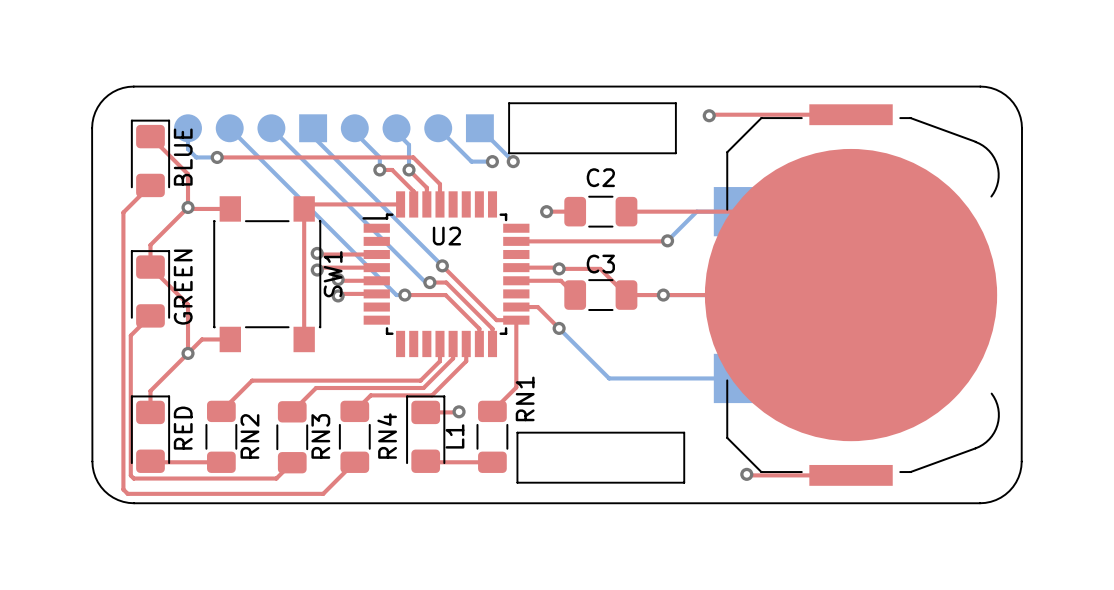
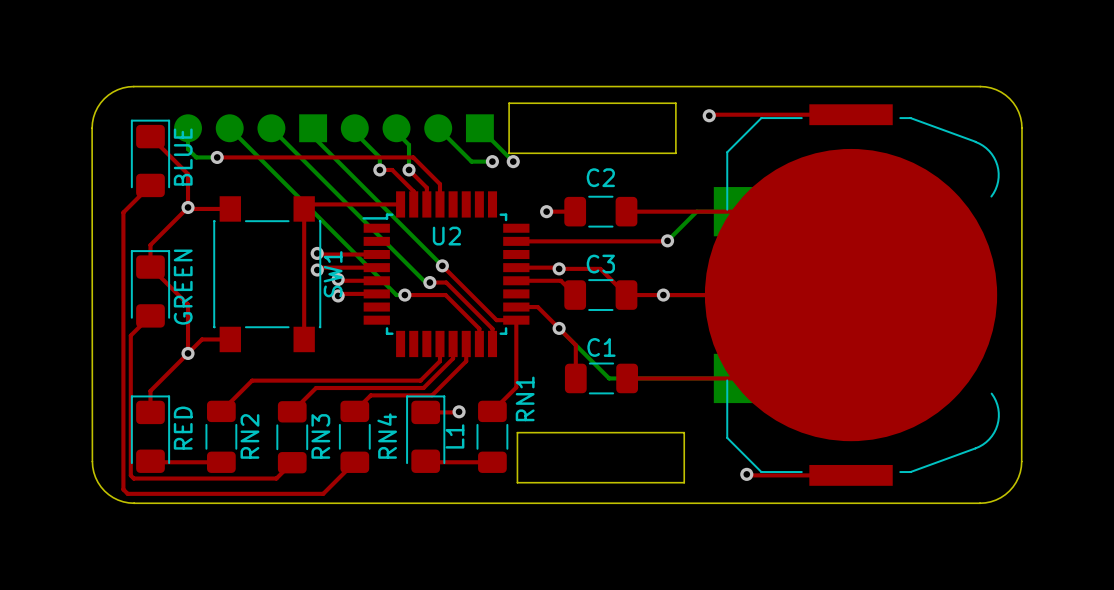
top track: none -> (851, 295) (767, 378) (627, 378)
top track: none -> (559, 328) (575, 345) (575, 378)
C1: none -> (601, 378)

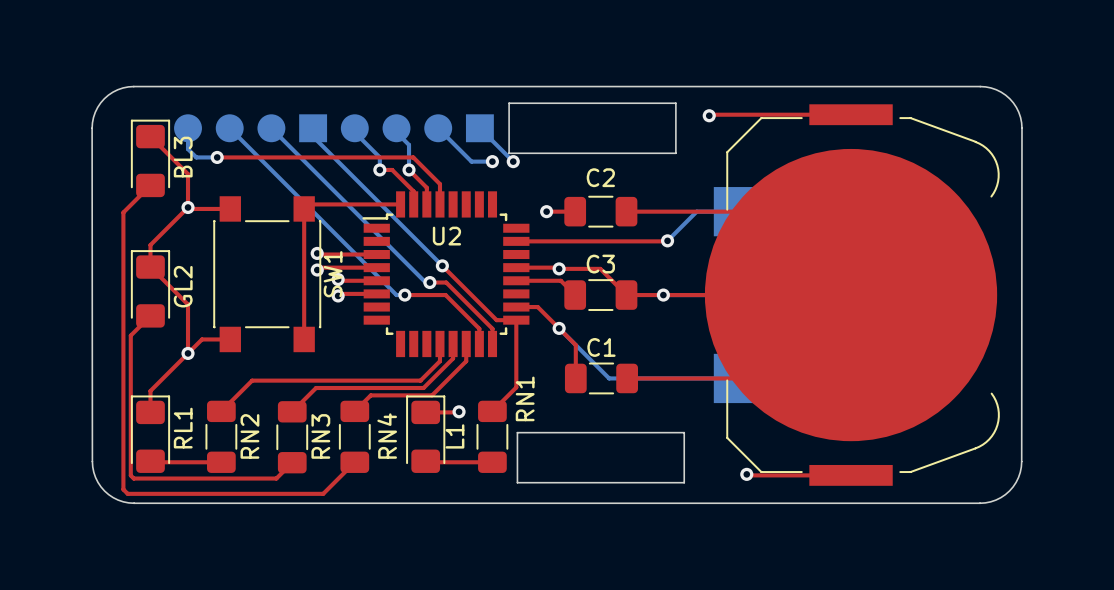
part value: BLUE (183, 157) -> BL3 (183, 157)
part value: GREEN (183, 287) -> GL2 (183, 286)
part value: RED (183, 428) -> RL1 (183, 428)

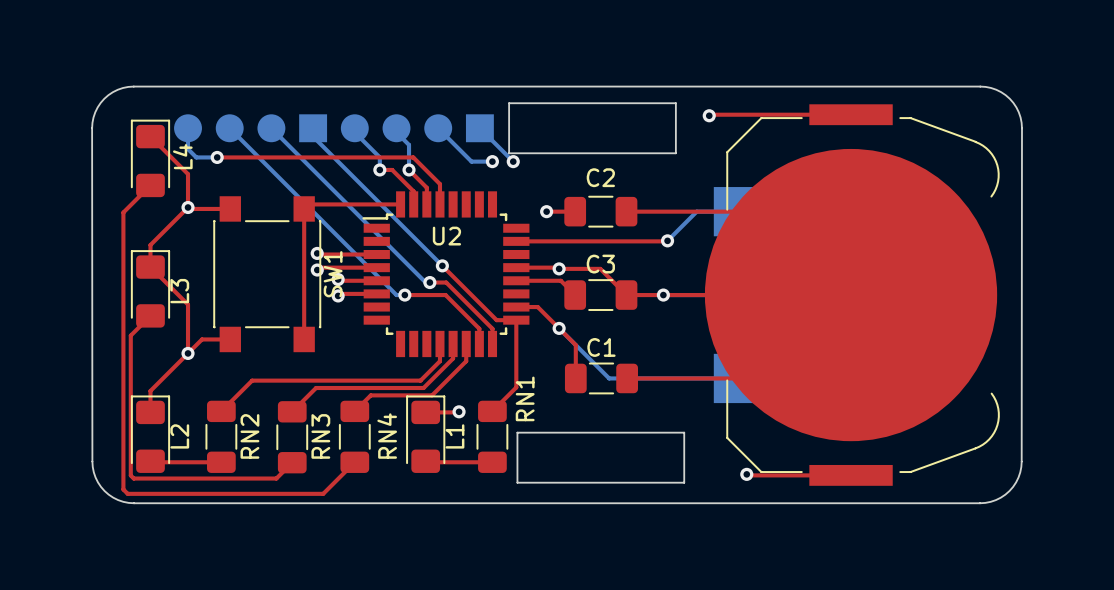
L4 name: none -> L4 (182, 156)
L4 value: BL3 (183, 157) -> none
L3 value: GL2 (183, 286) -> none
L3 name: none -> L3 (179, 291)
L2 value: RL1 (183, 428) -> none
L2 name: none -> L2 (179, 436)

